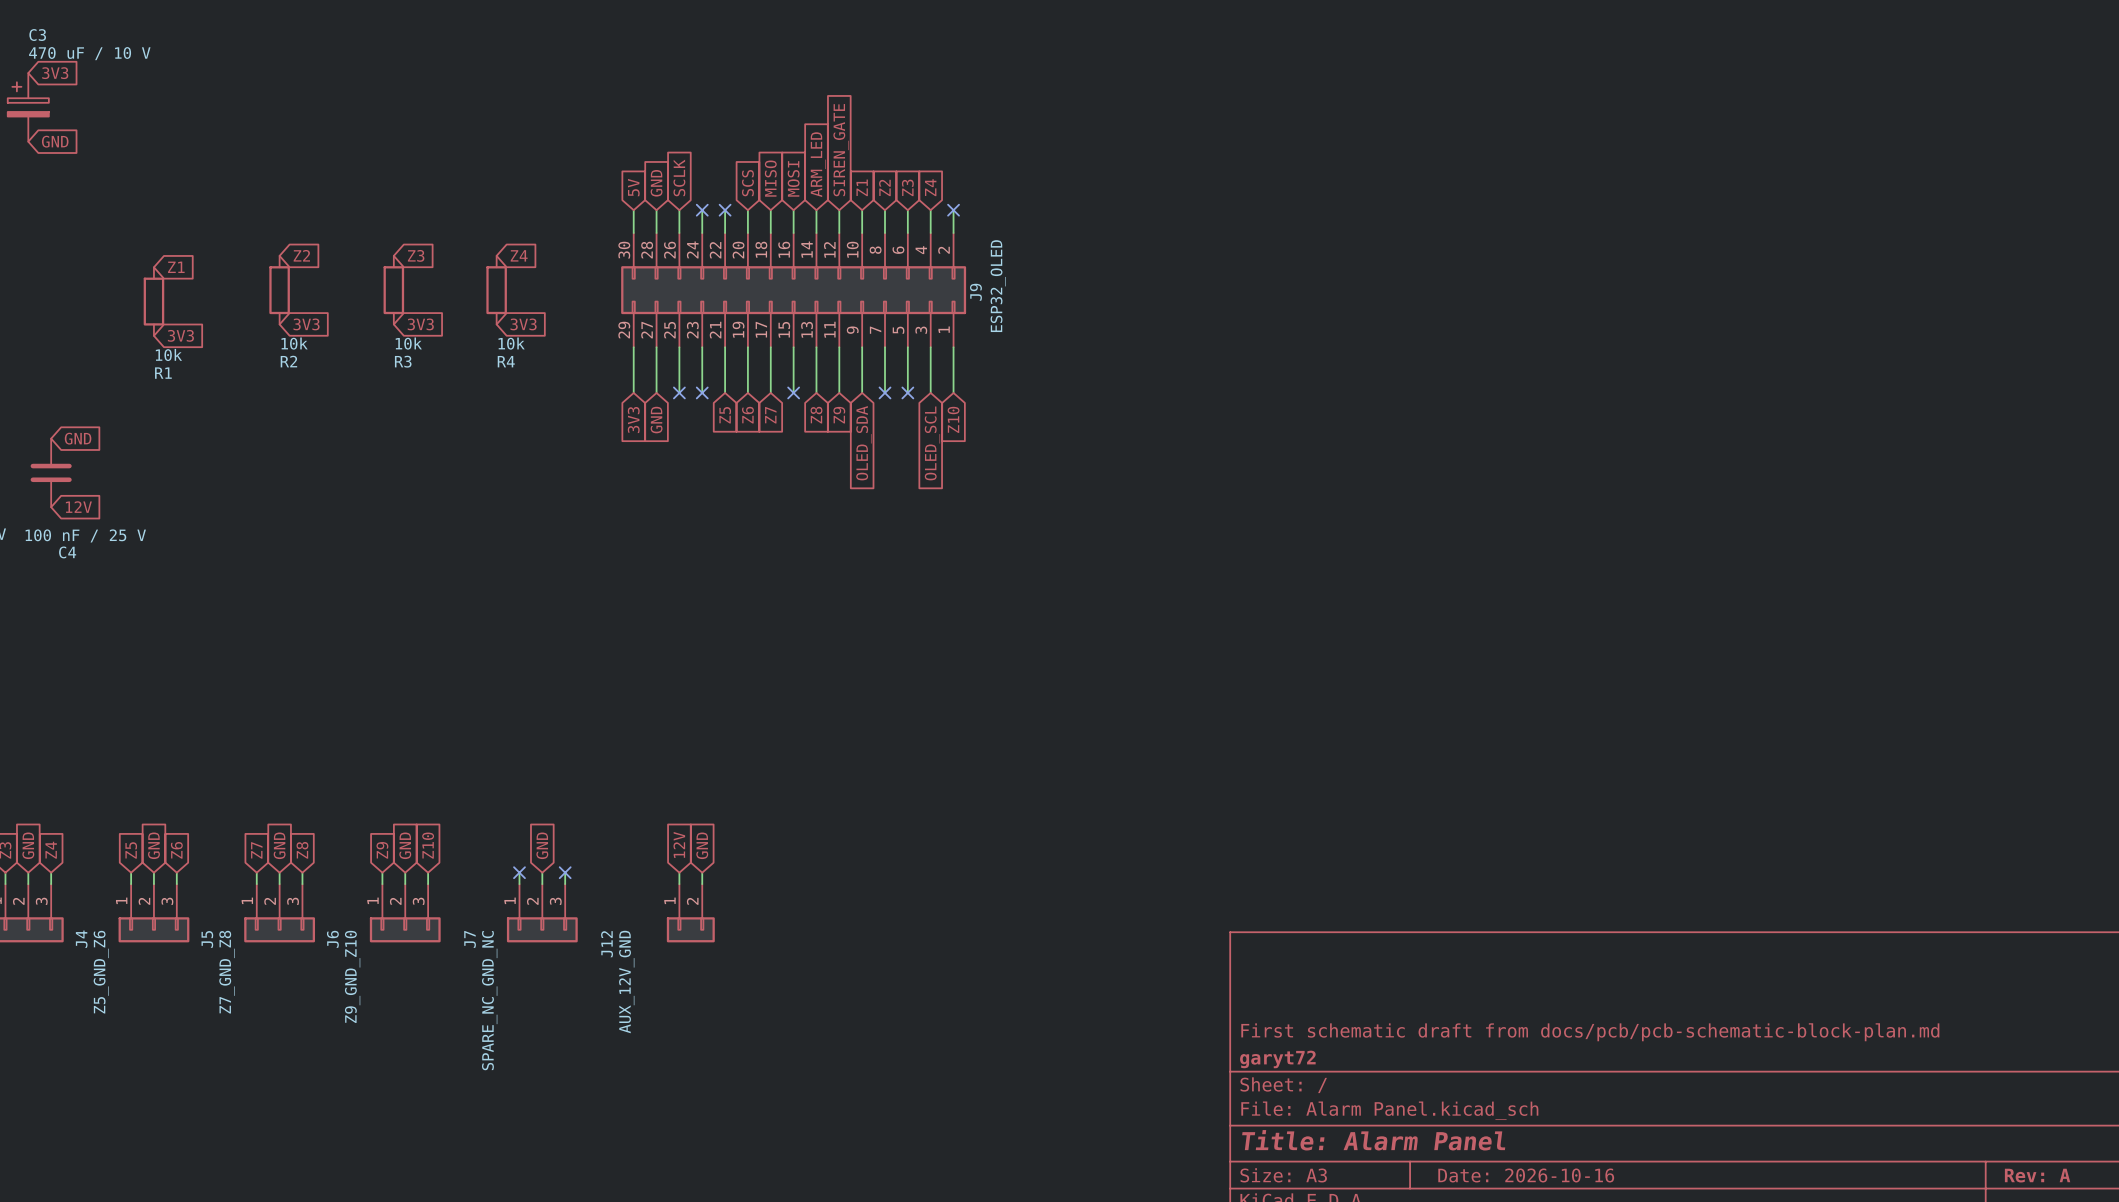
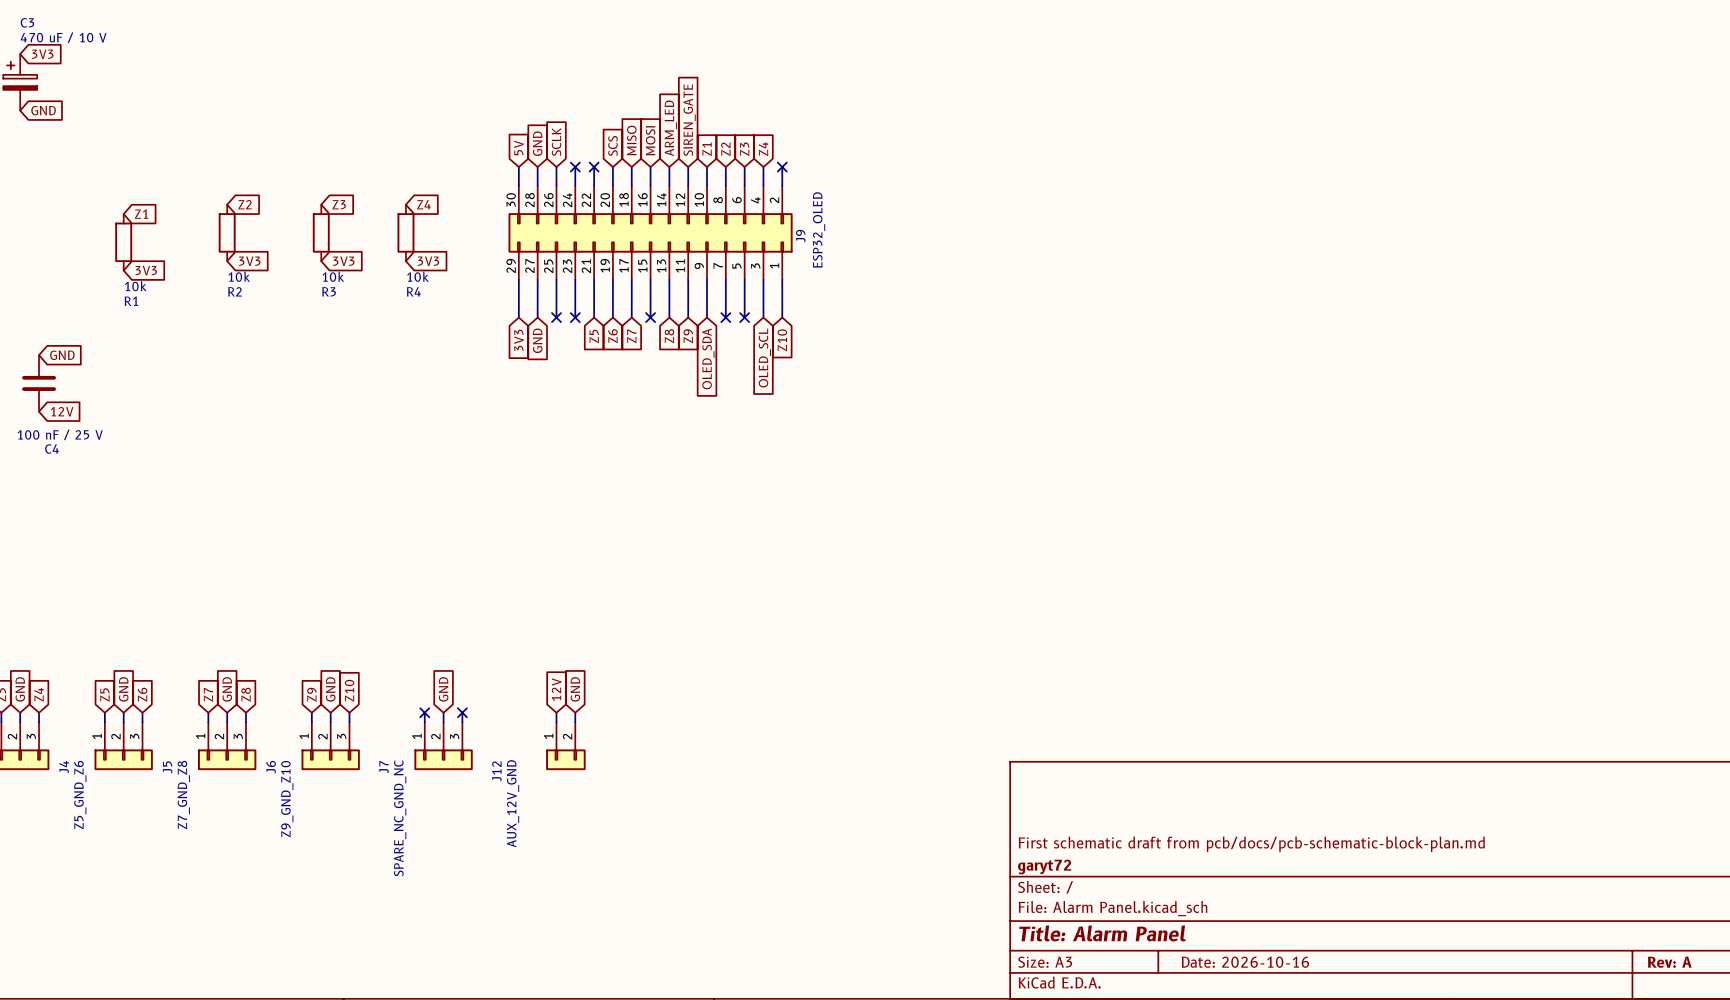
title block: First schematic draft from docs/pcb/pcb-schematic-block-plan.md (1590, 1032) -> First schematic draft from pcb/docs/pcb-schematic-block-plan.md (1251, 844)

